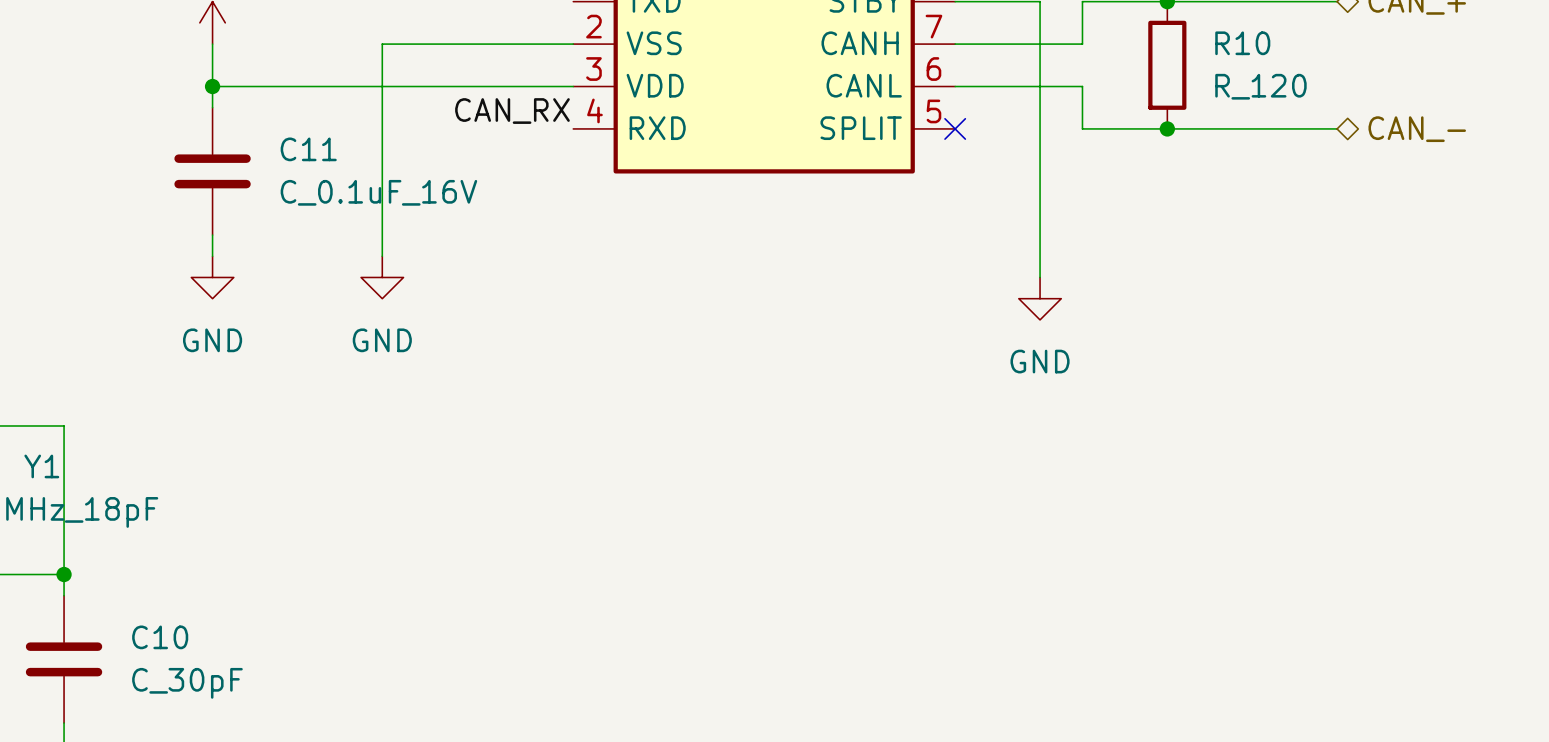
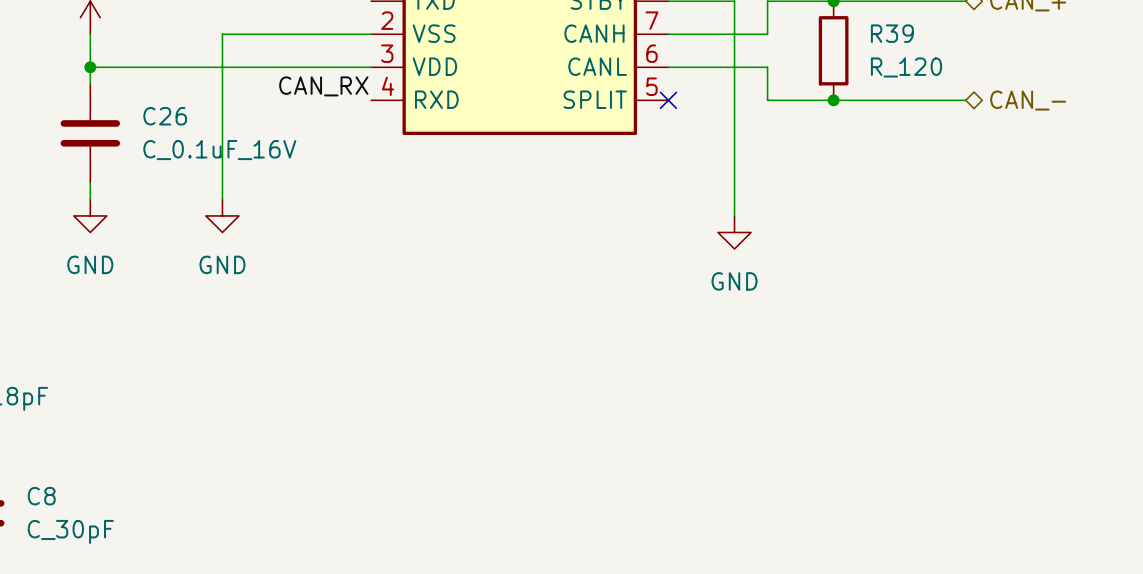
R10 name: R10 (1242, 43) -> R39 (892, 33)
C11 name: C11 (308, 149) -> C26 (165, 116)
C10 name: C10 (160, 637) -> C8 (41, 496)

